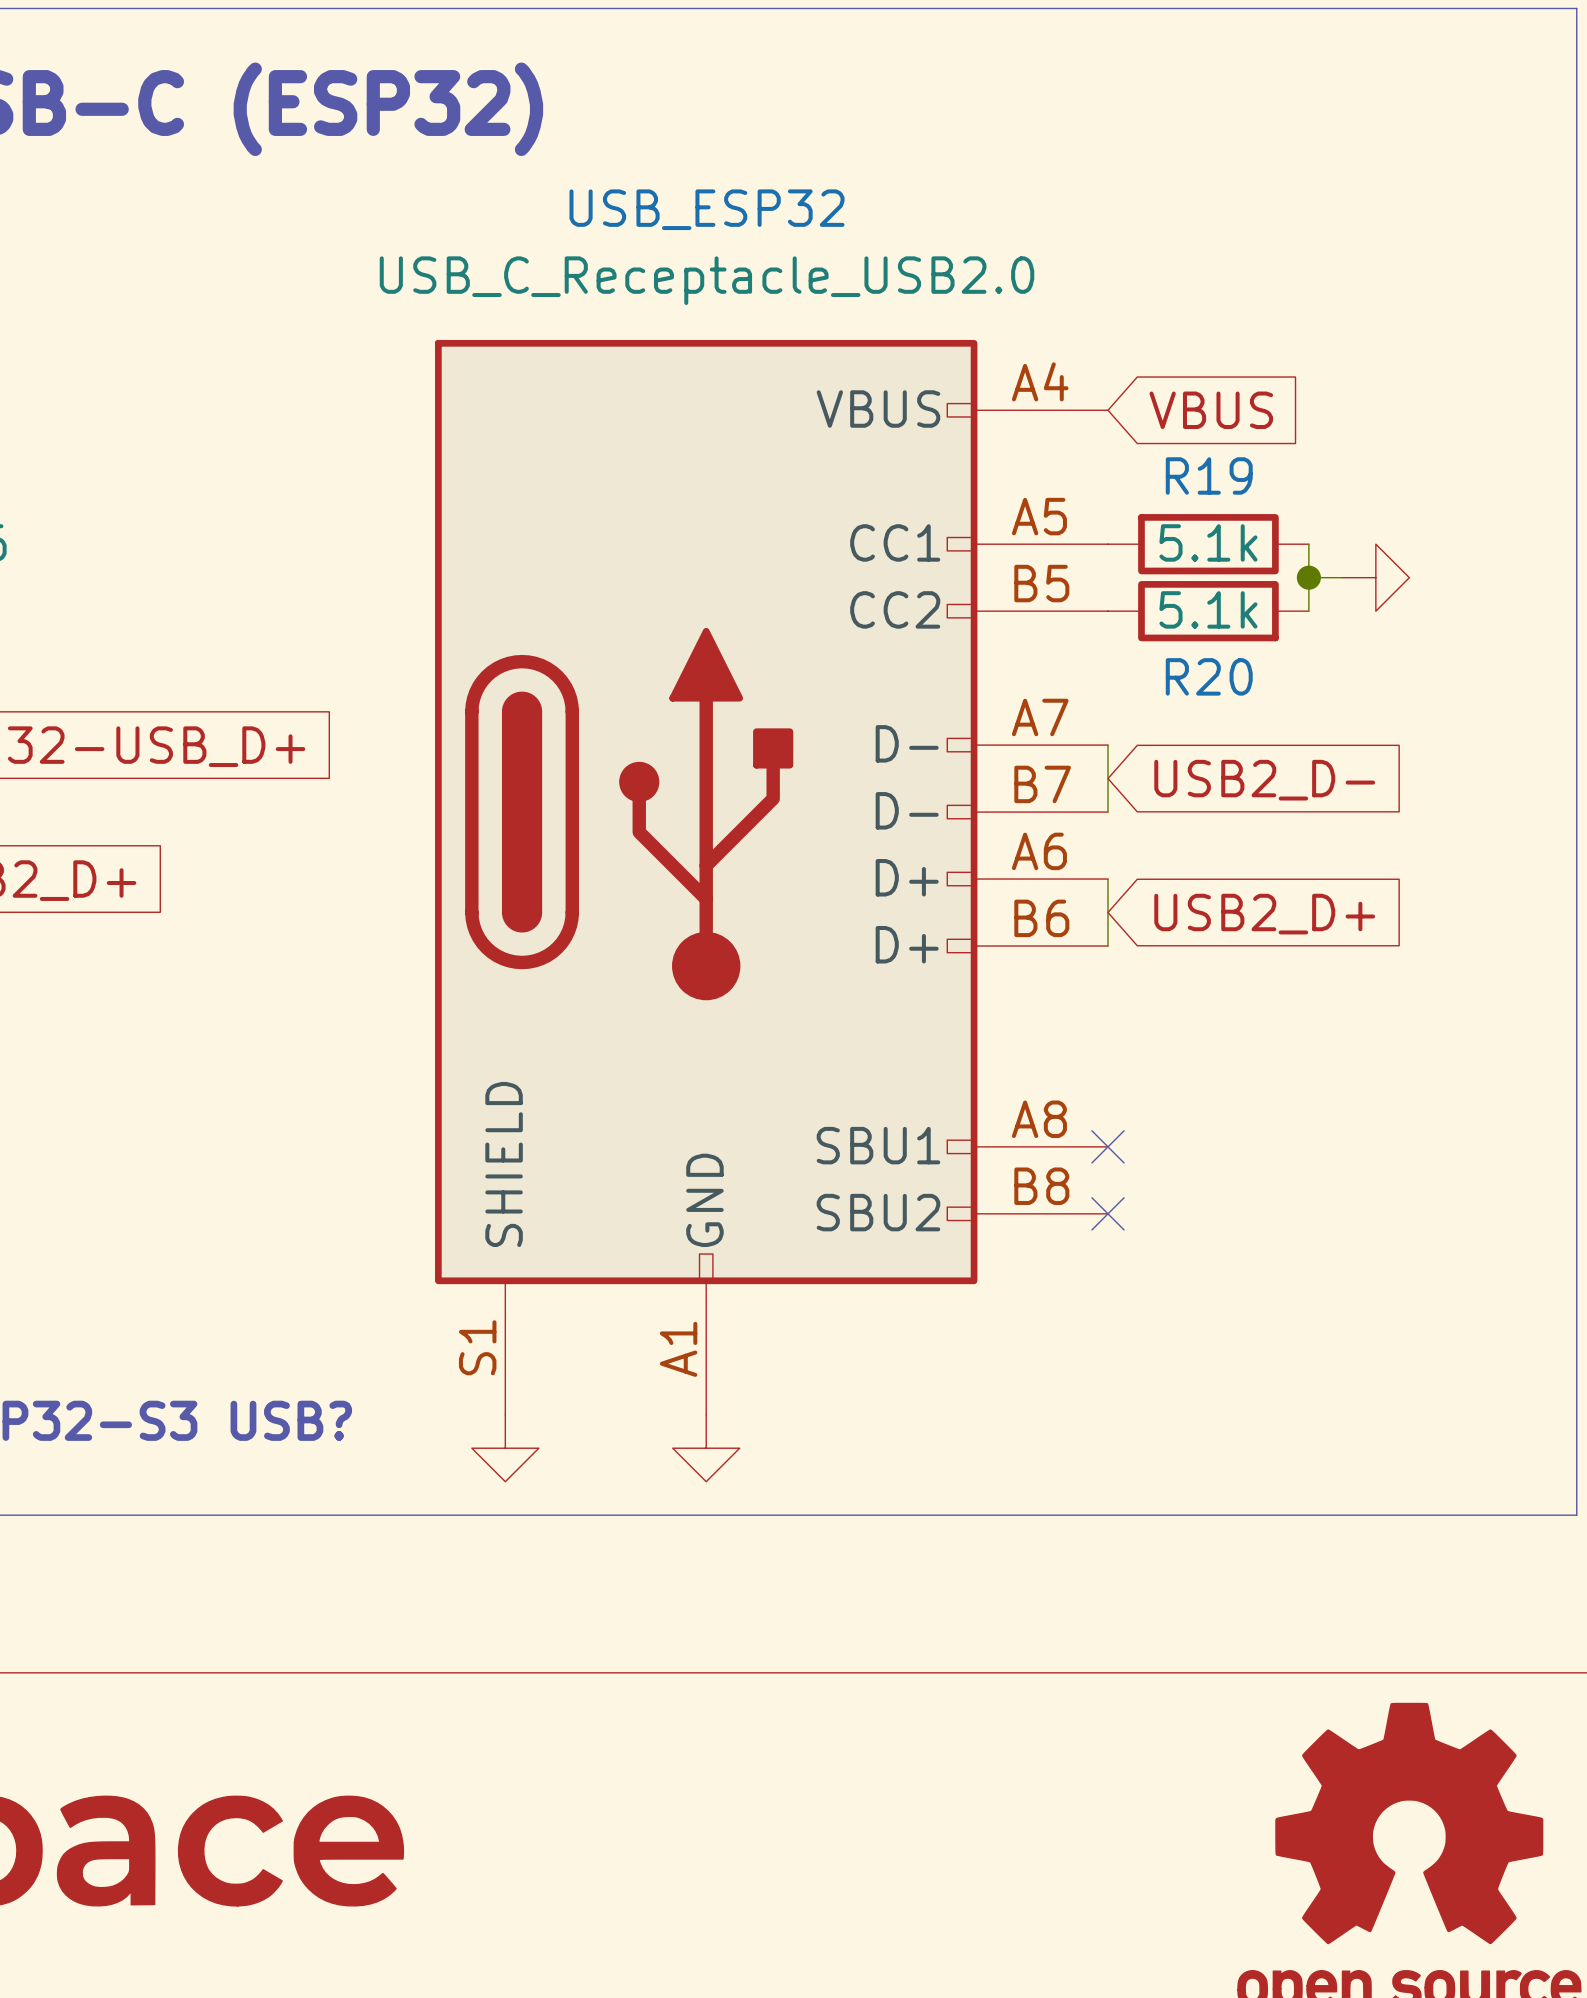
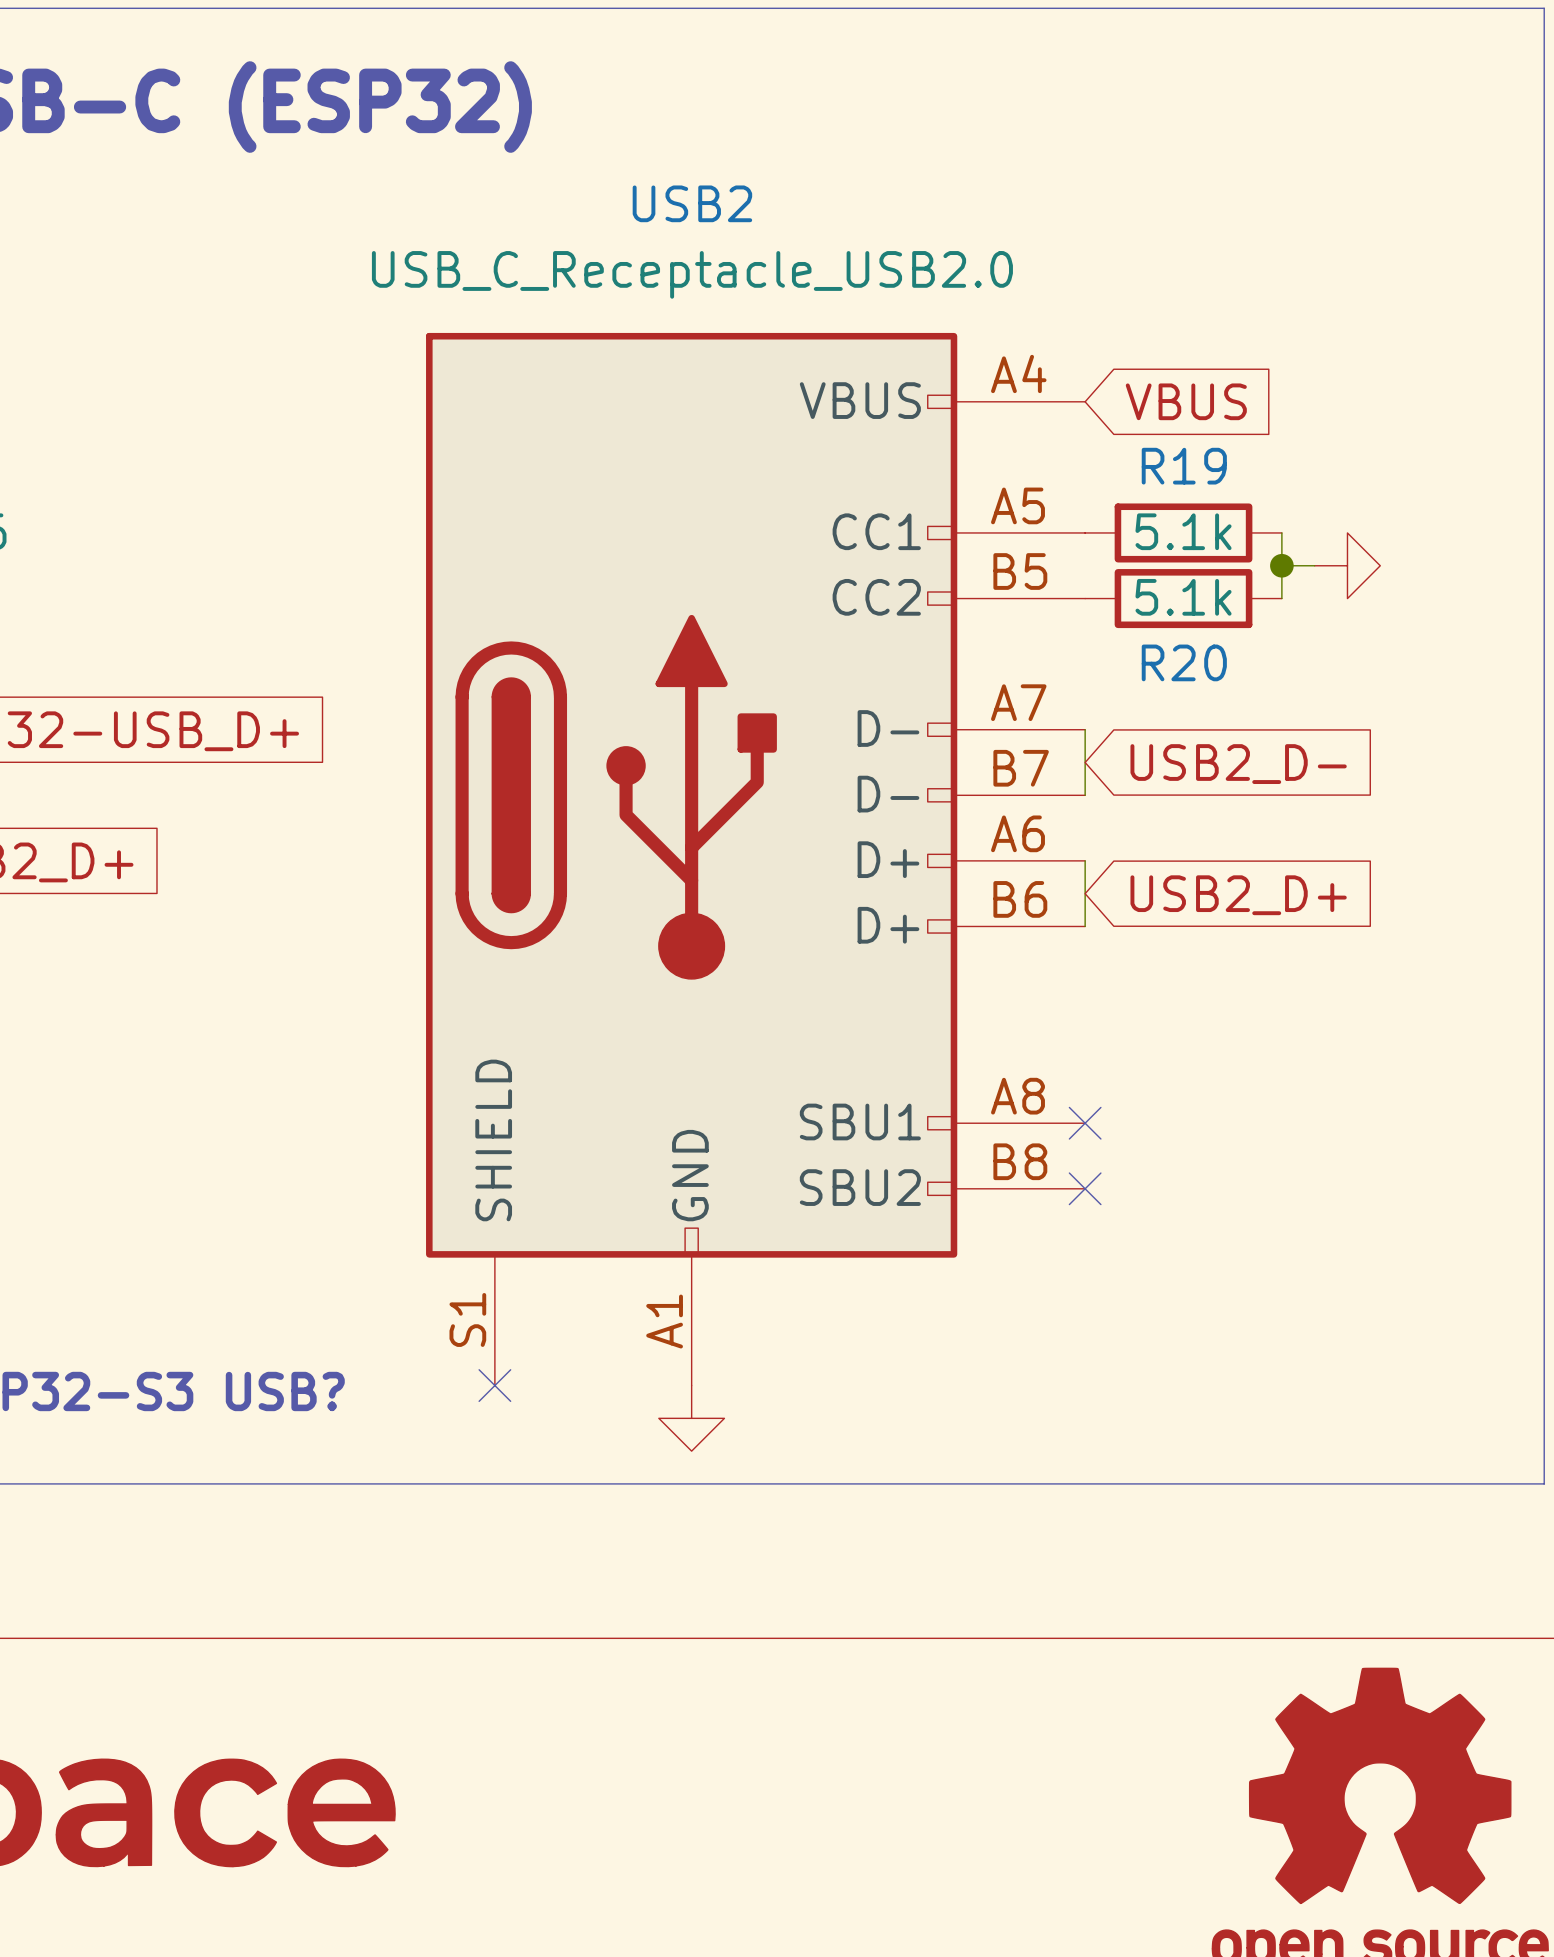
USB_ESP32 name: USB_ESP32 (707, 209) -> USB2 (692, 203)
no-connect mark: none -> (494, 1385)
power symbol: (505, 1448) -> none

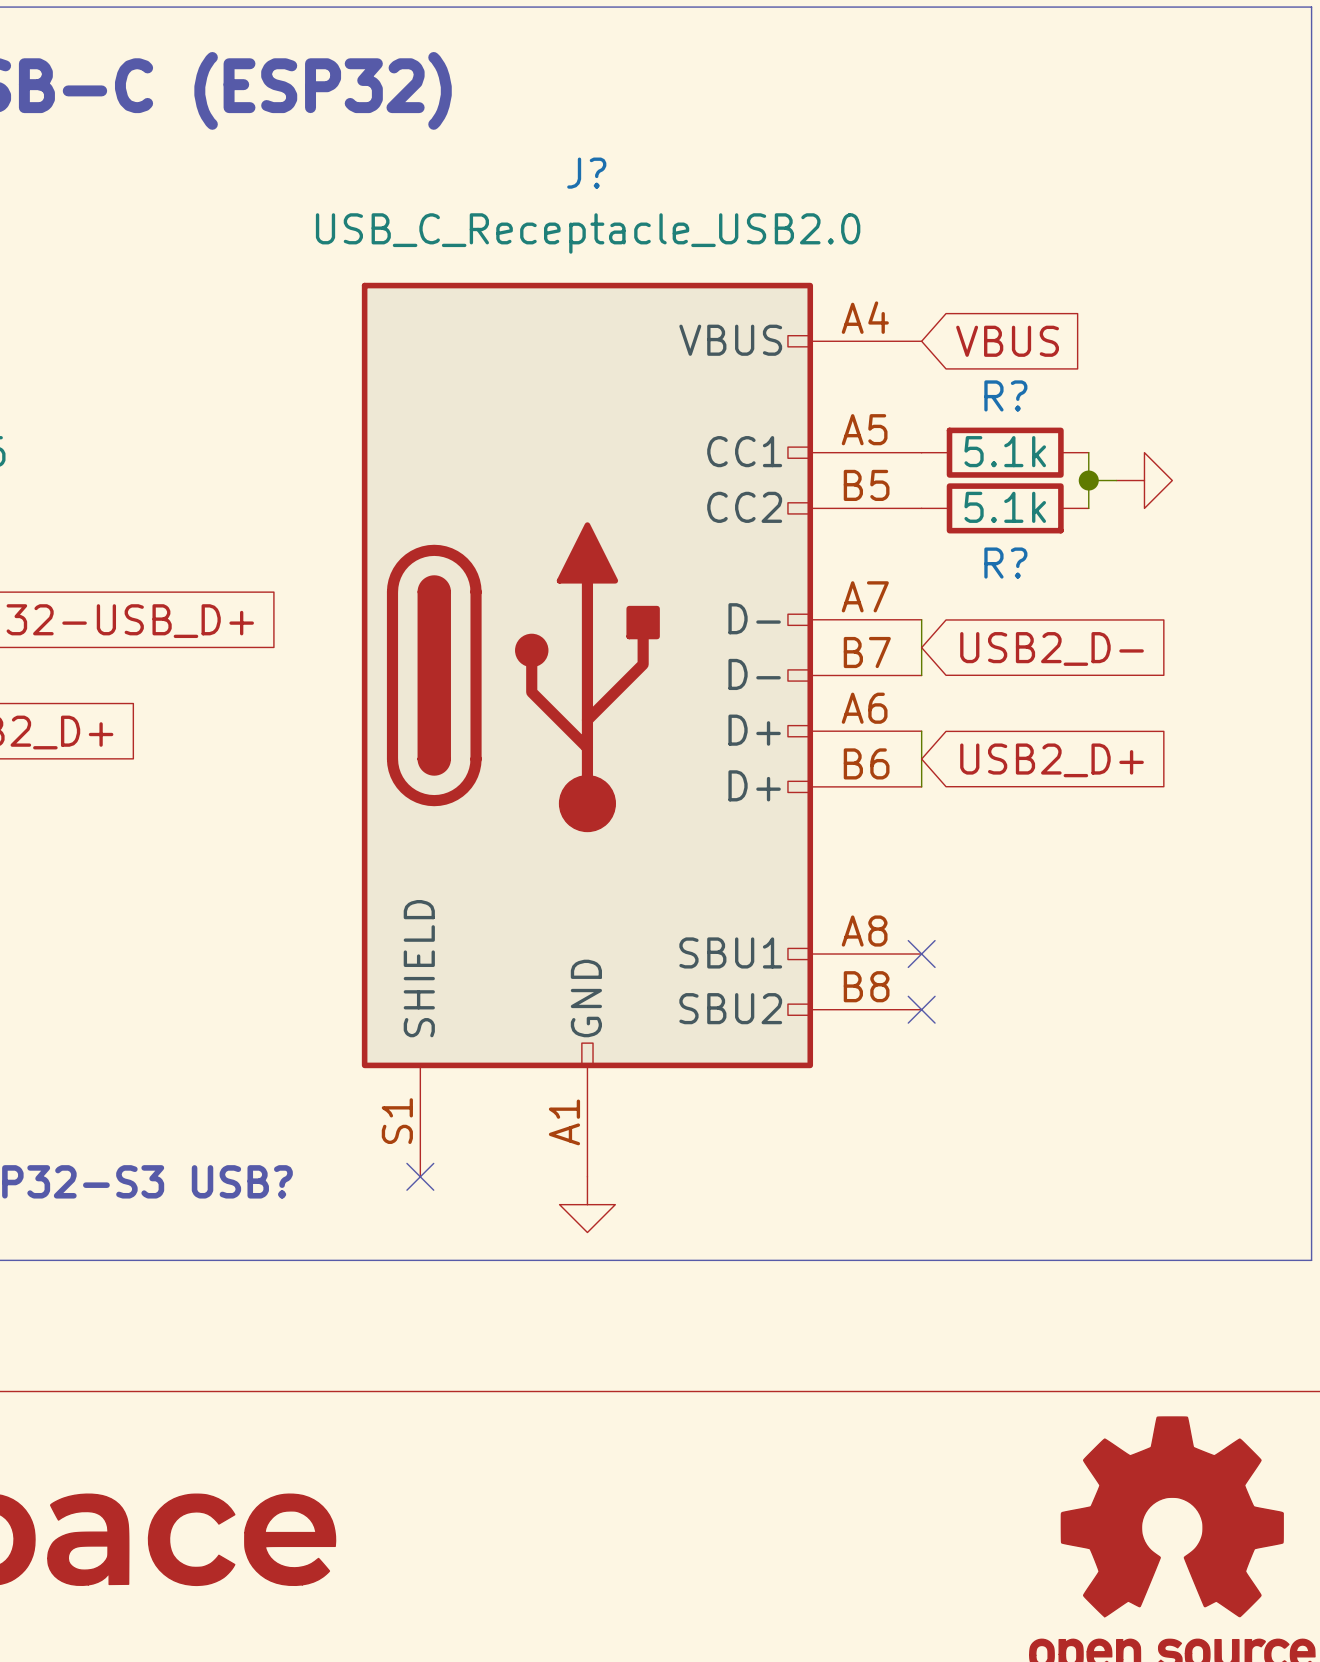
USB2 name: USB2 (692, 203) -> J? (586, 173)
R19 name: R19 (1184, 466) -> R? (1005, 395)
R20 name: R20 (1184, 662) -> R? (1005, 563)

